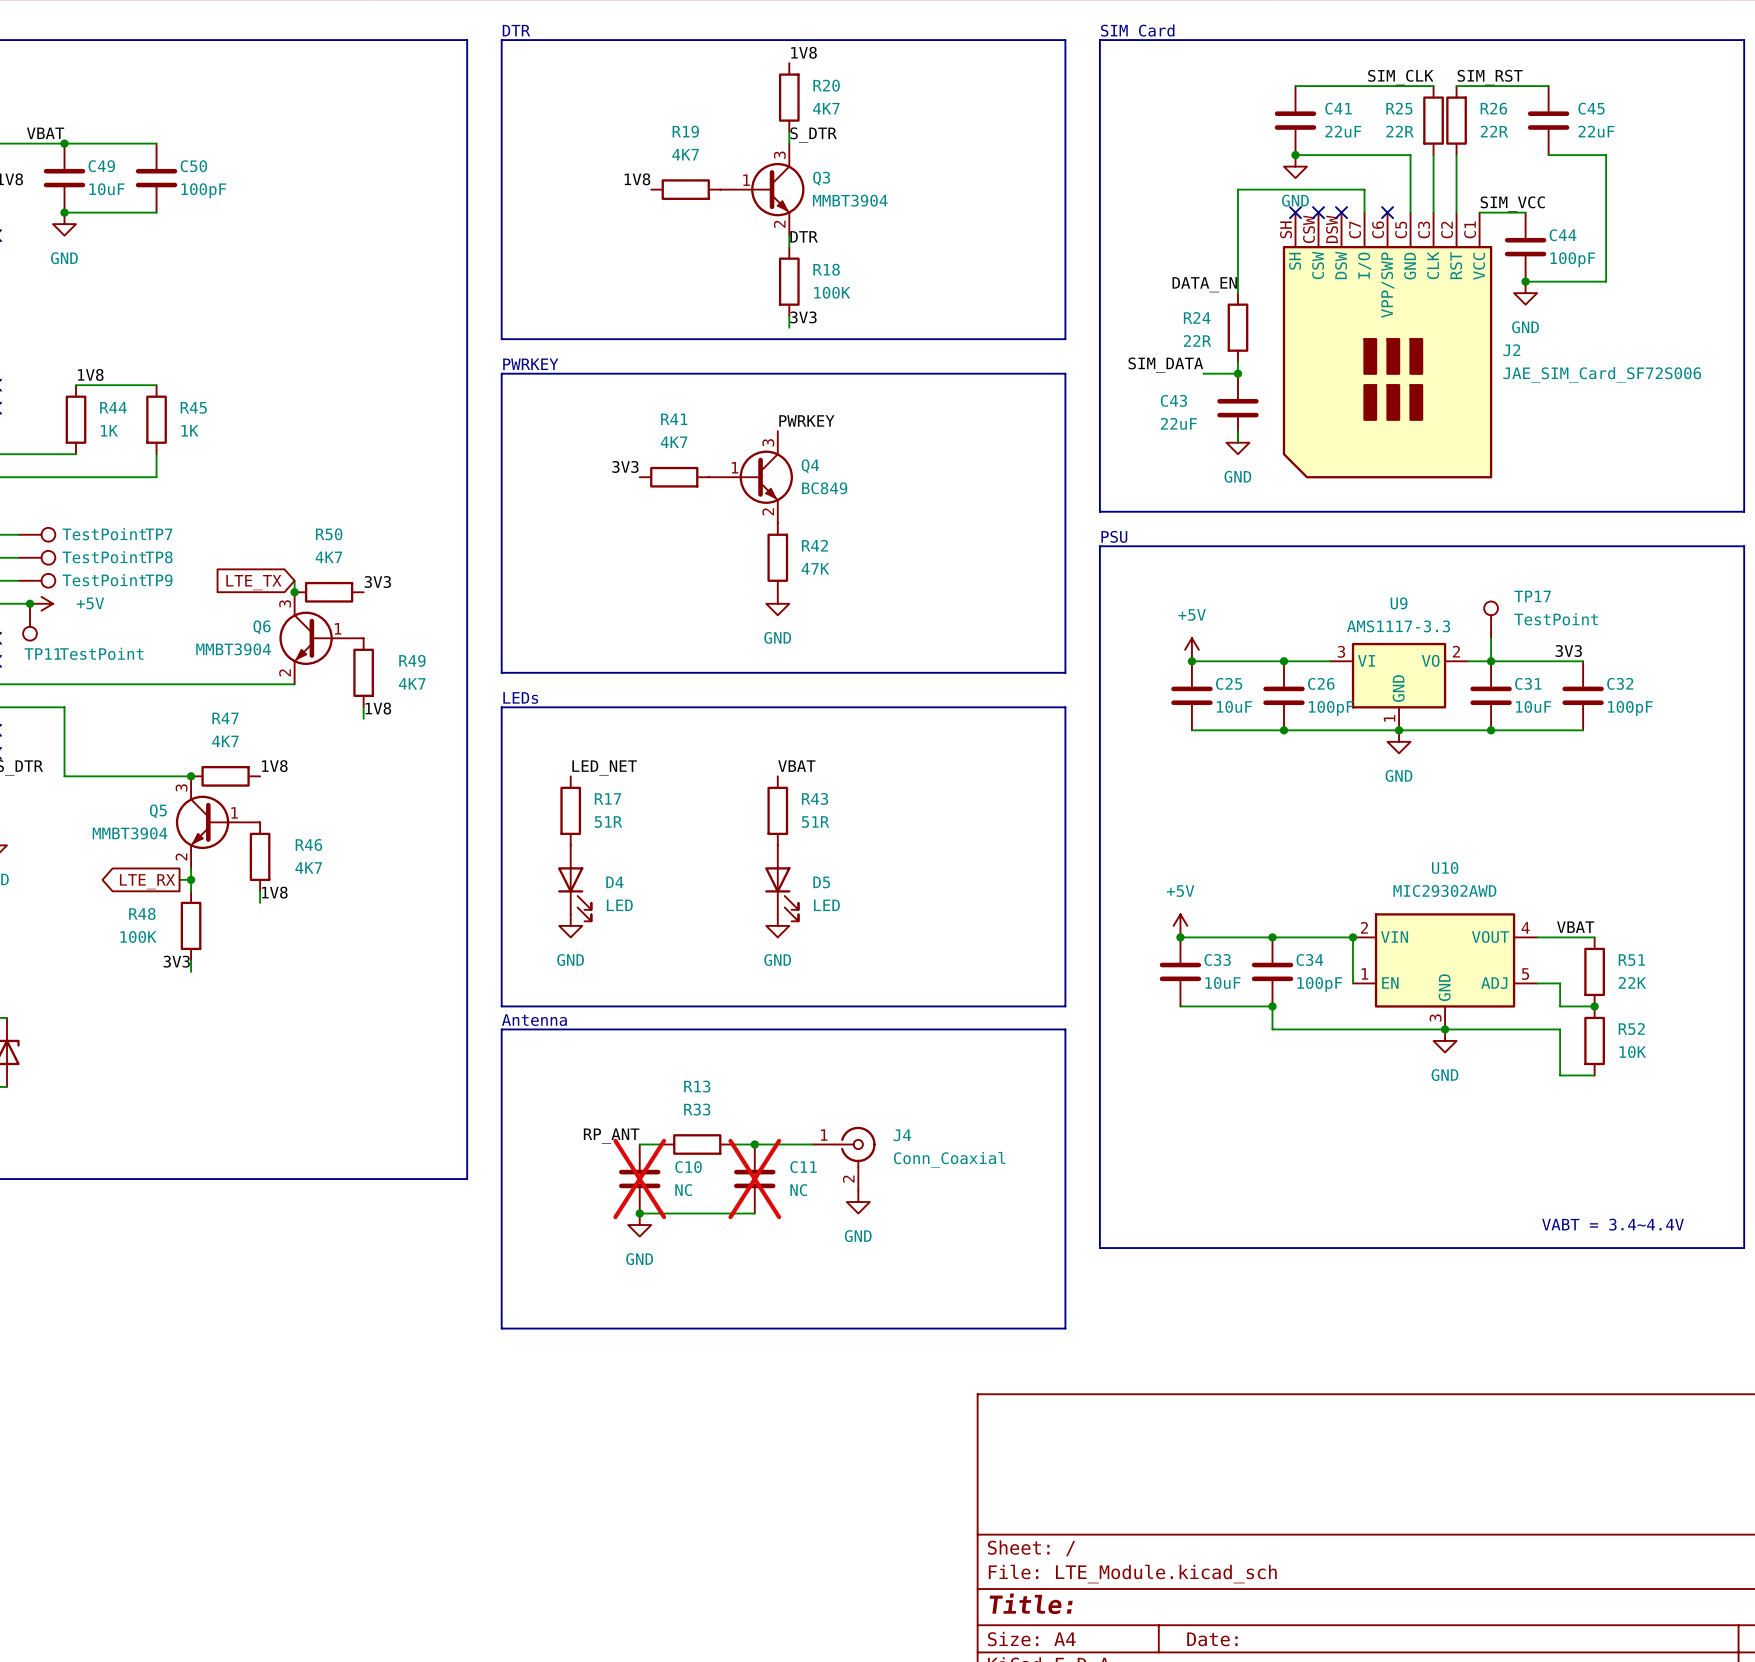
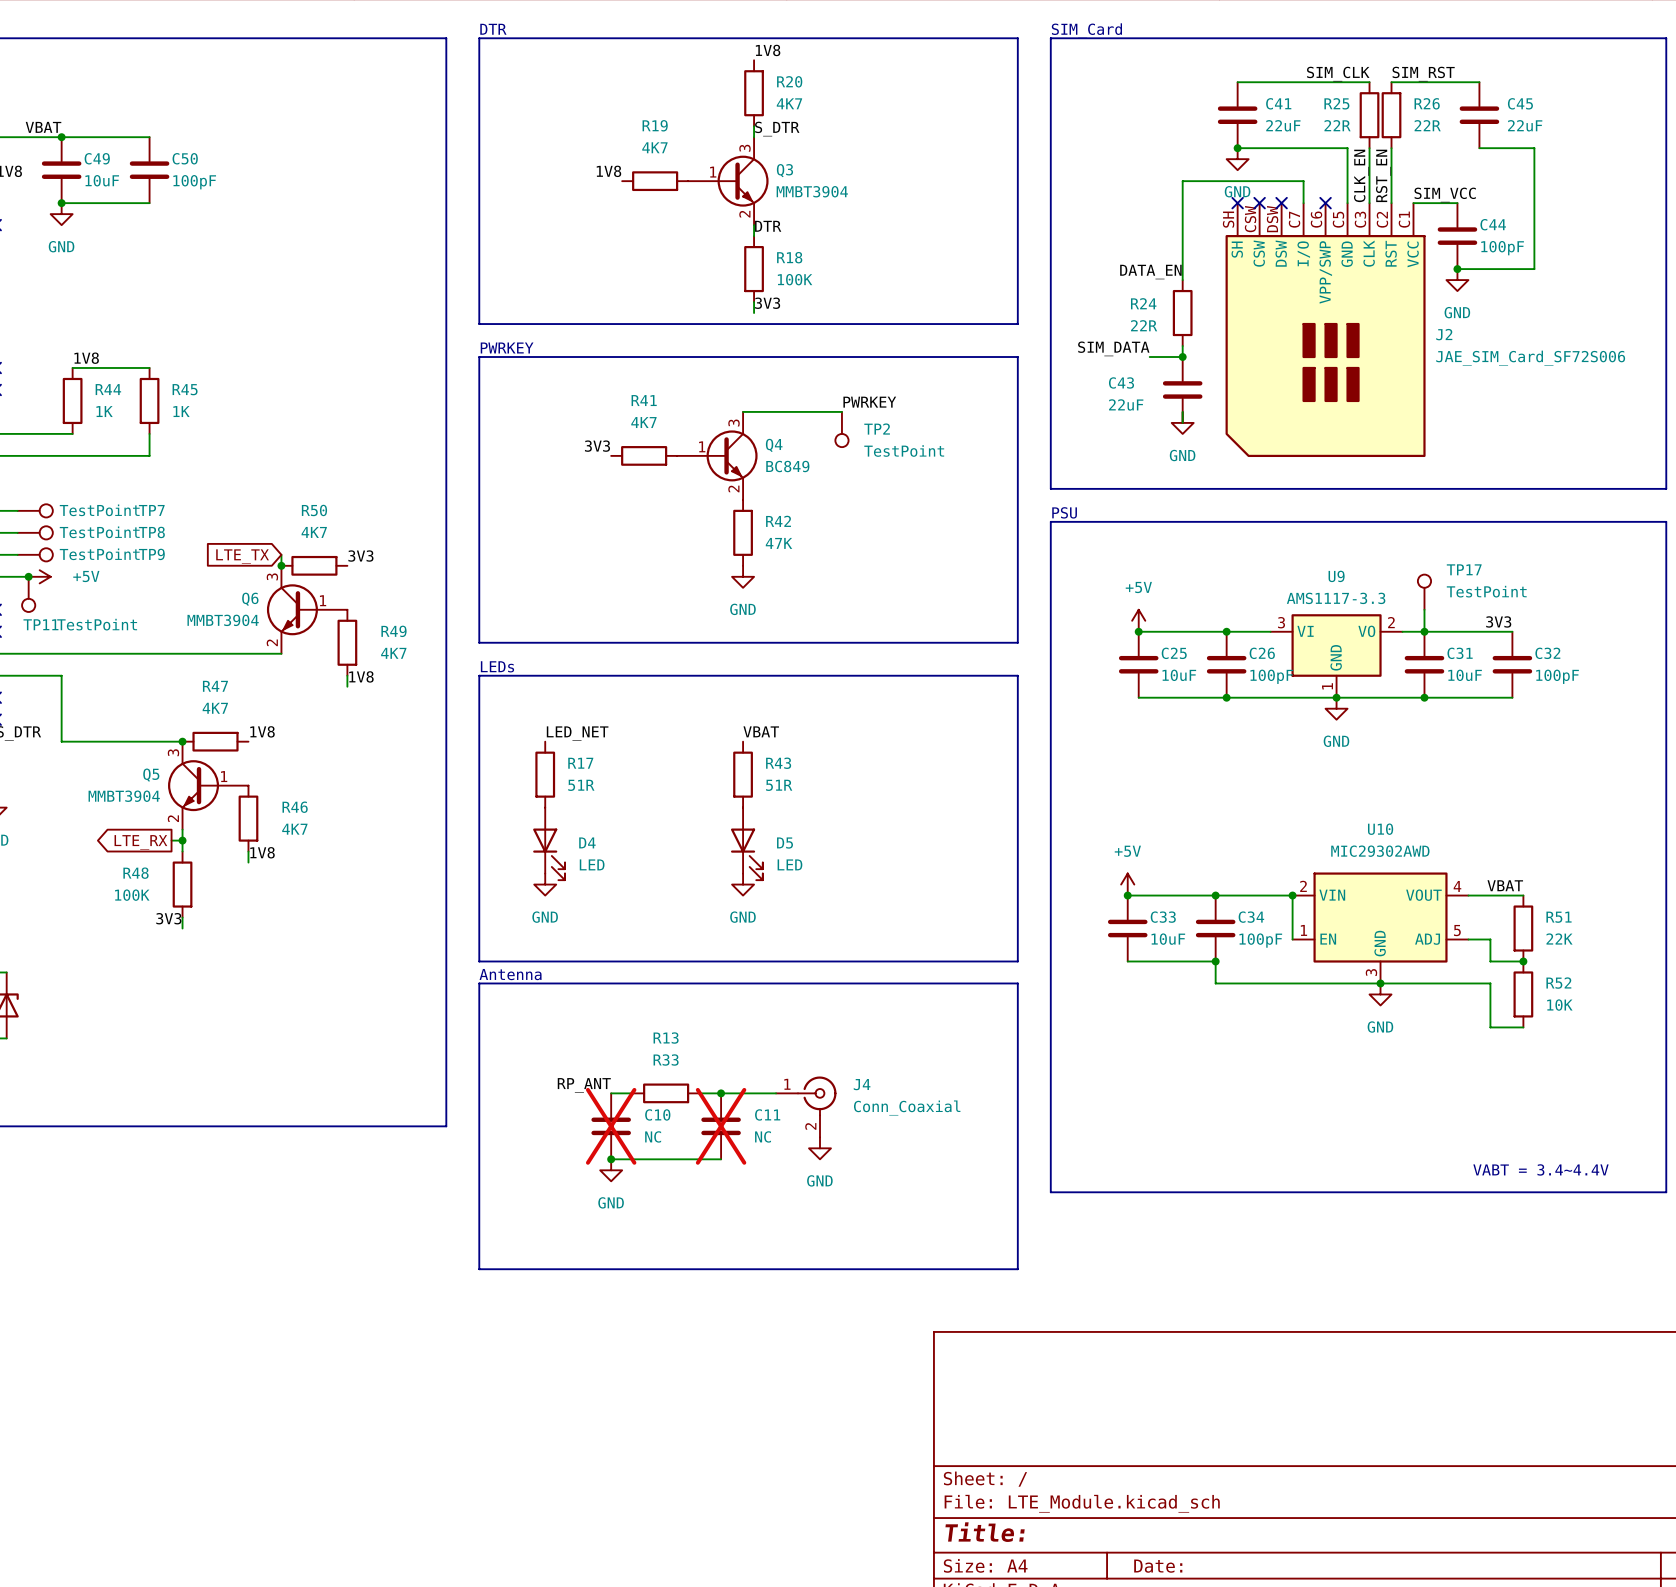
label: none -> CLK_EN (1361, 175)
label: none -> RST_EN (1383, 175)
label position: PWRKEY (806, 420) -> PWRKEY (869, 402)
wire: none -> (743, 411) (841, 411)
TP2: none -> TestPoint (841, 429)

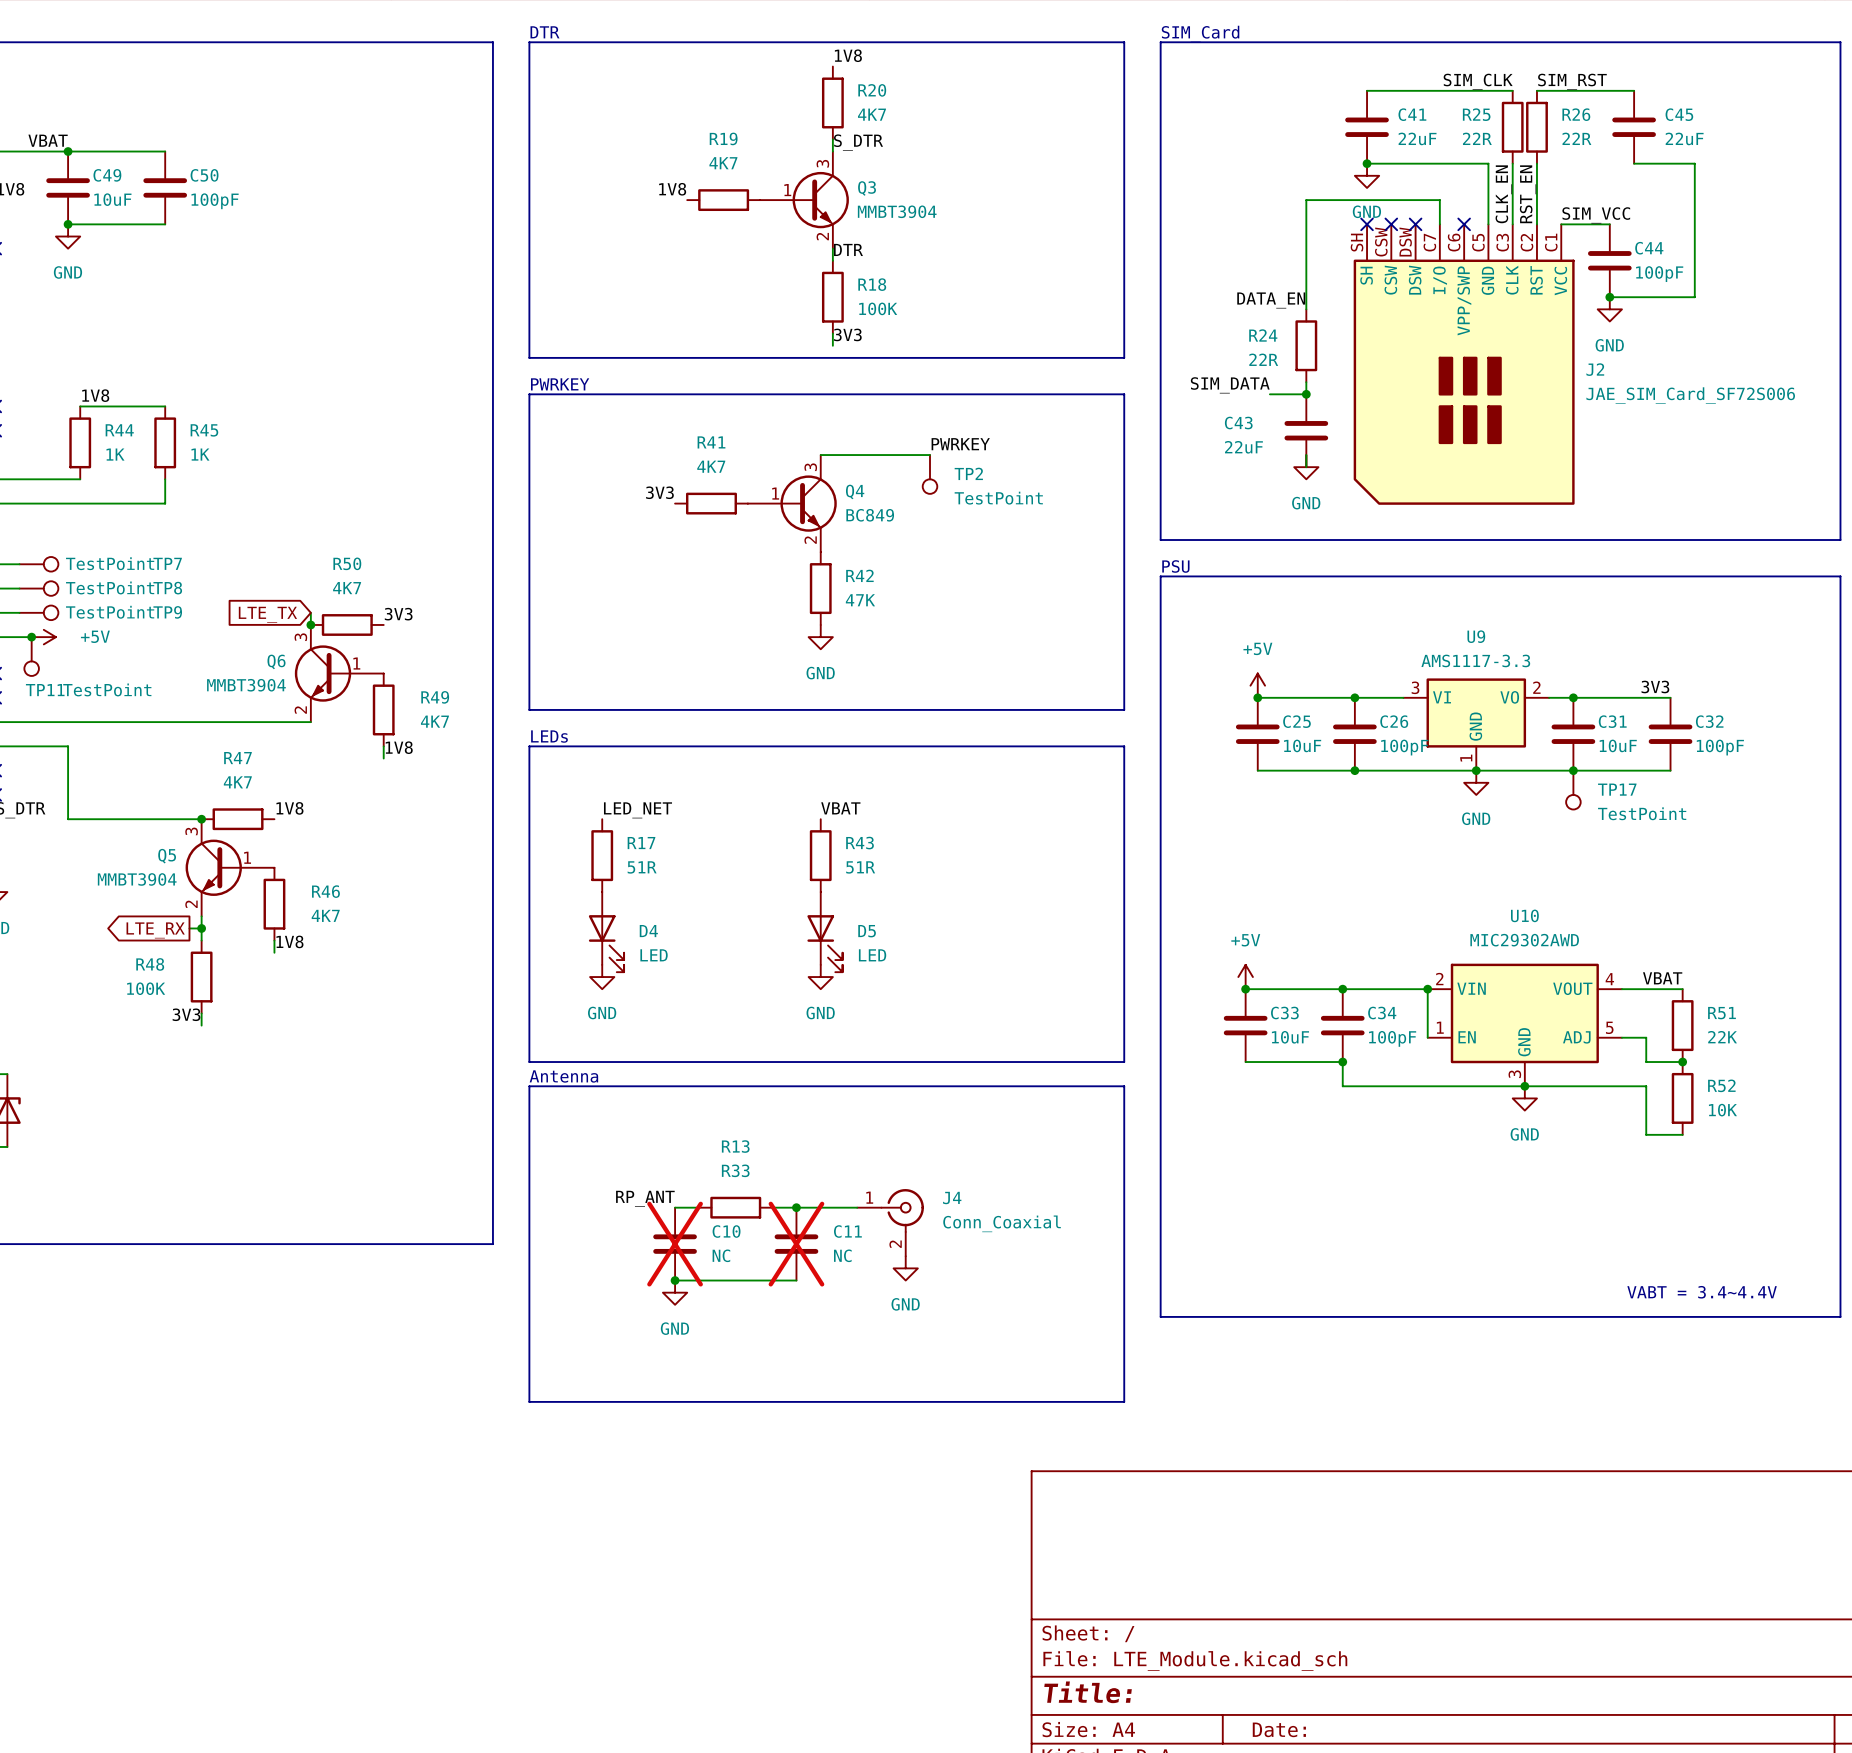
TP17 name position: TP17 (1464, 569) -> TP17 (1617, 789)
TP17 rotation: 0° (1424, 581) -> 180° (1573, 802)
TP17 value position: TestPoint (1486, 591) -> TestPoint (1642, 813)
TP17 position: (1424, 592) -> (1573, 790)
wire: (1424, 609) (1424, 631) -> none

